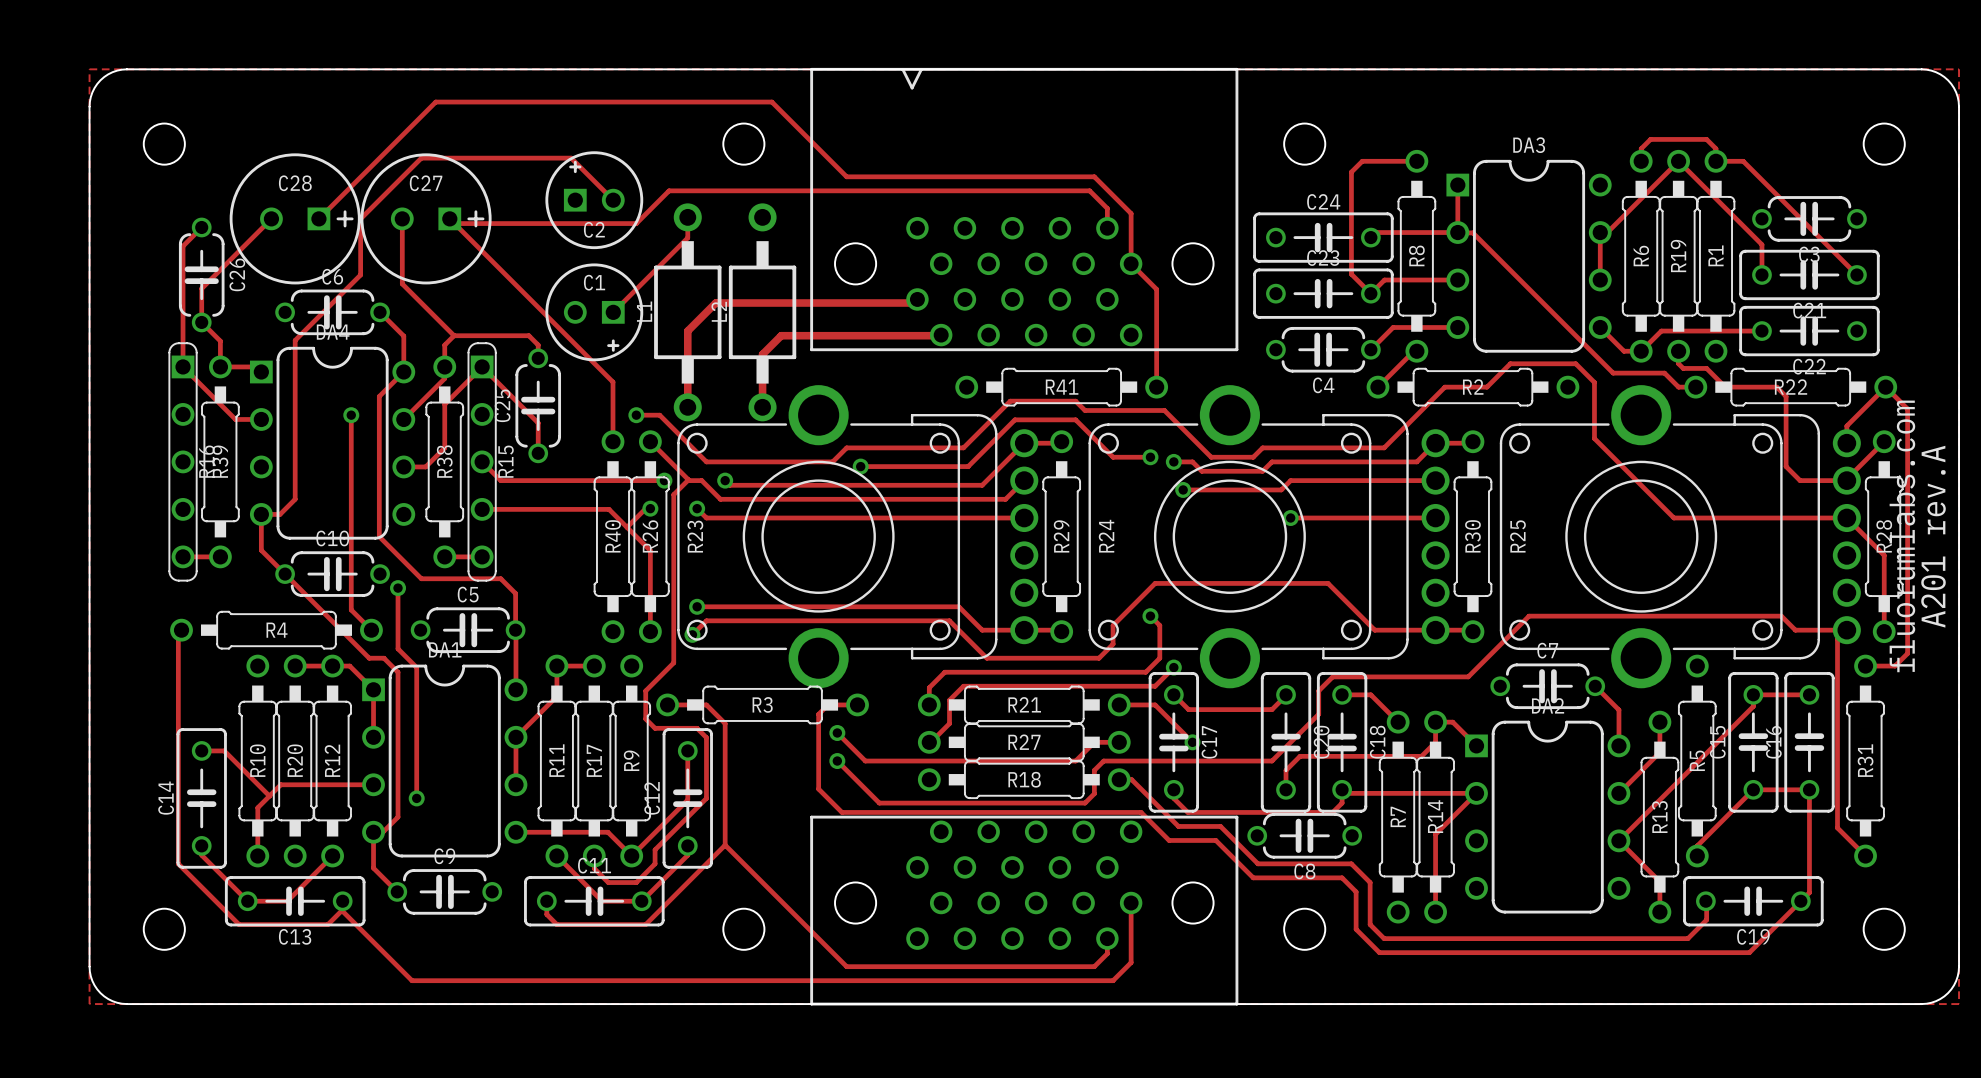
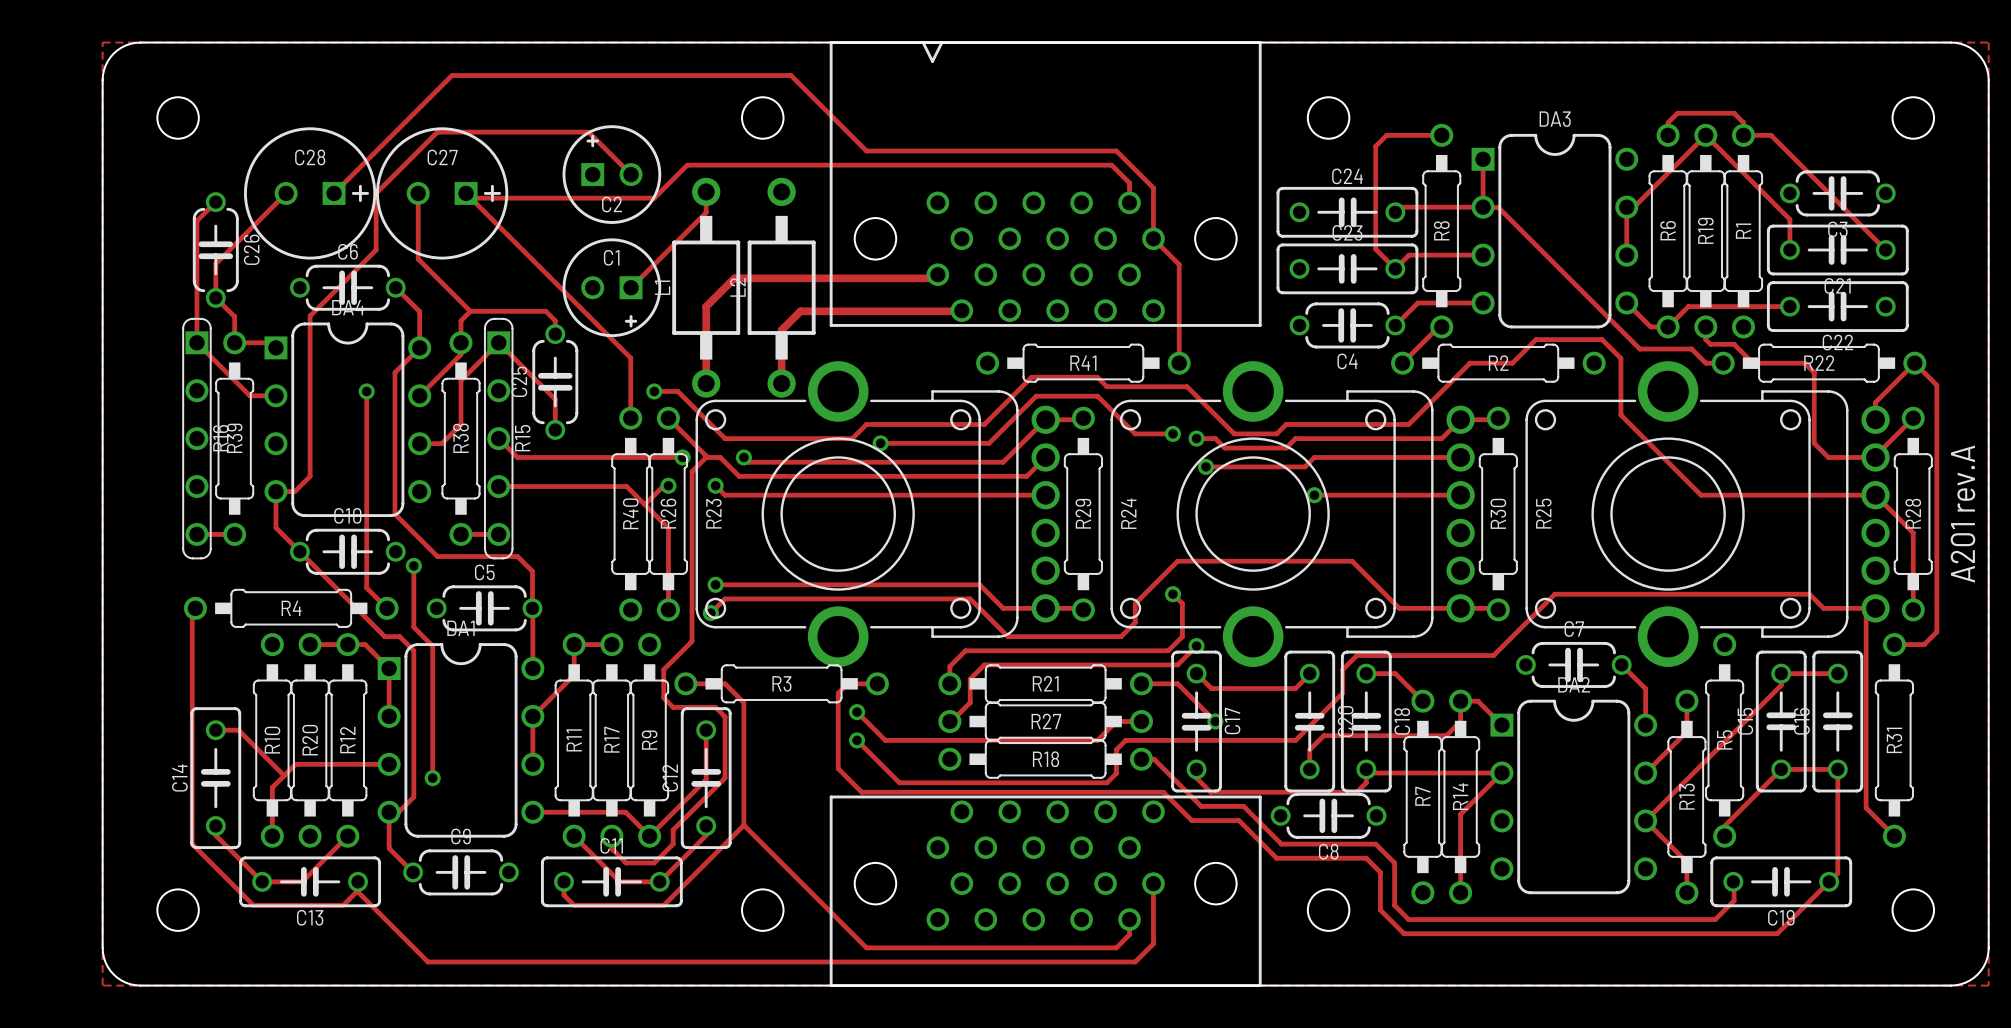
part text: fluorumlabs.com (1902, 536) -> none

